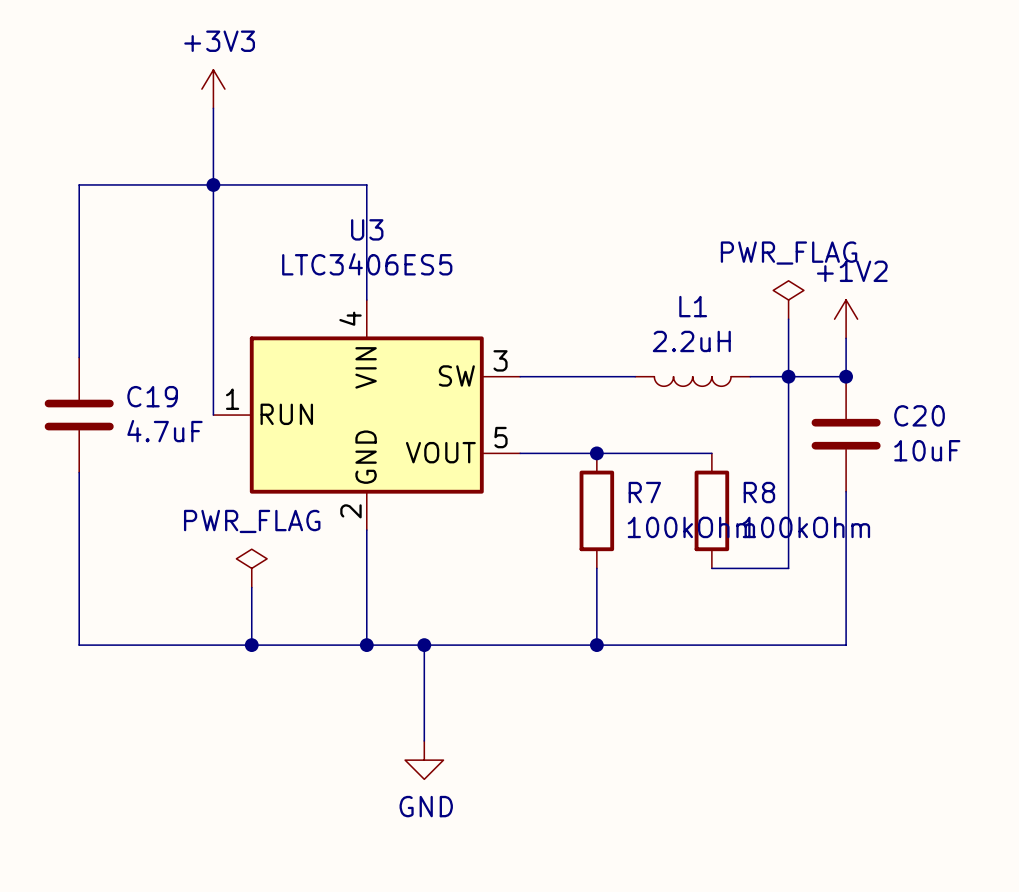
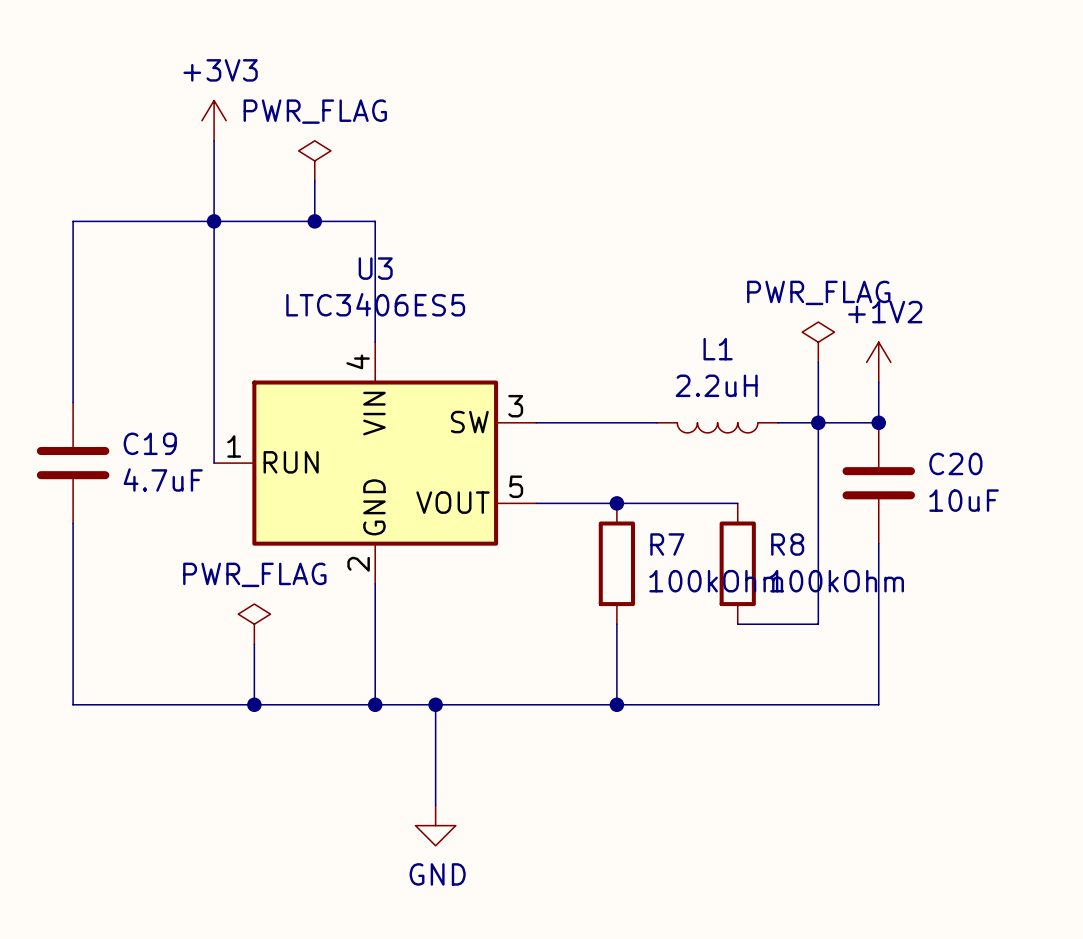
power symbol: none -> PWR_FLAG (314, 160)
wire: none -> (314, 181) (314, 221)
junction: none -> (314, 221)

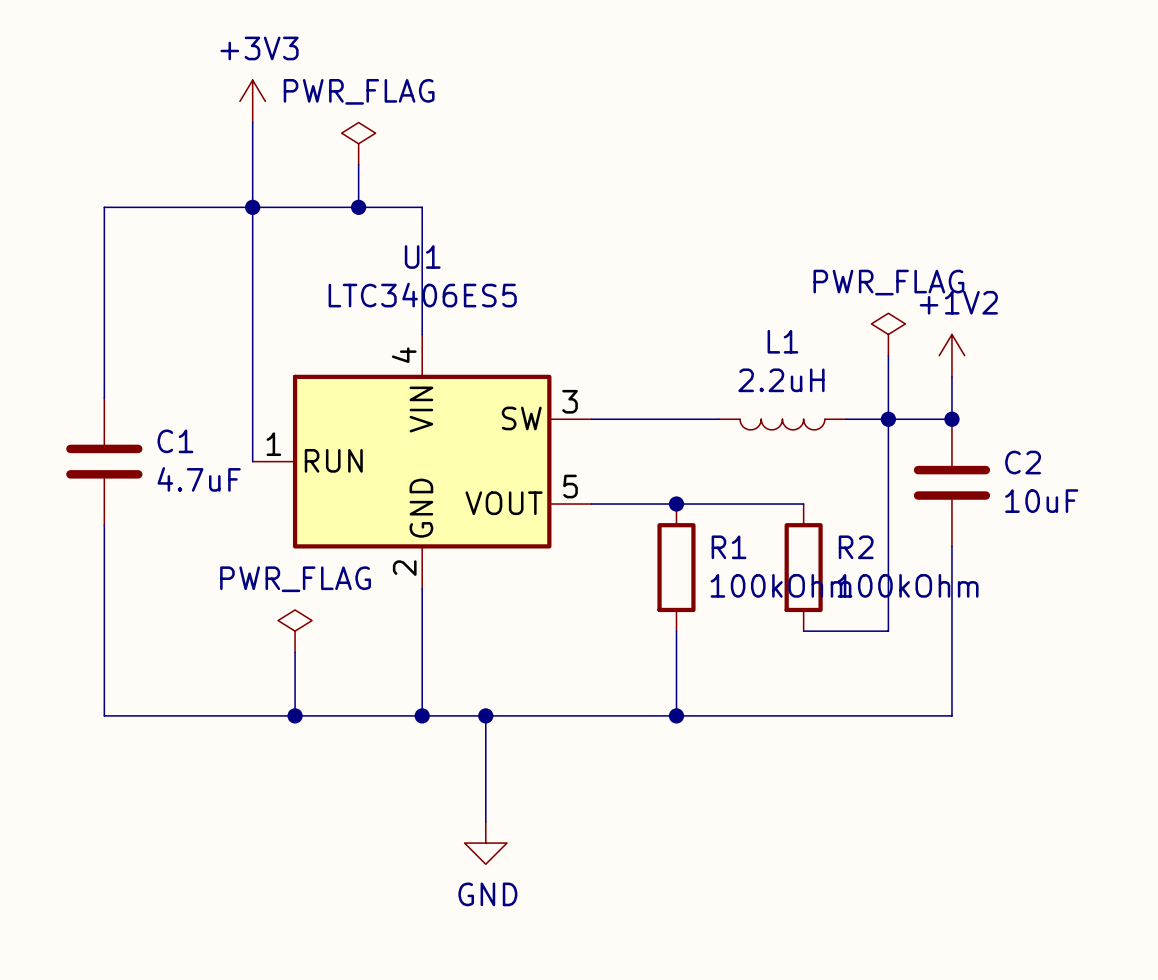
U3 name: U3 (375, 268) -> U1 (422, 256)
C19 name: C19 (150, 443) -> C1 (175, 441)
C20 name: C20 (955, 463) -> C2 (1023, 462)
R7 name: R7 (667, 544) -> R1 (729, 547)
R8 name: R8 (787, 544) -> R2 (856, 547)

